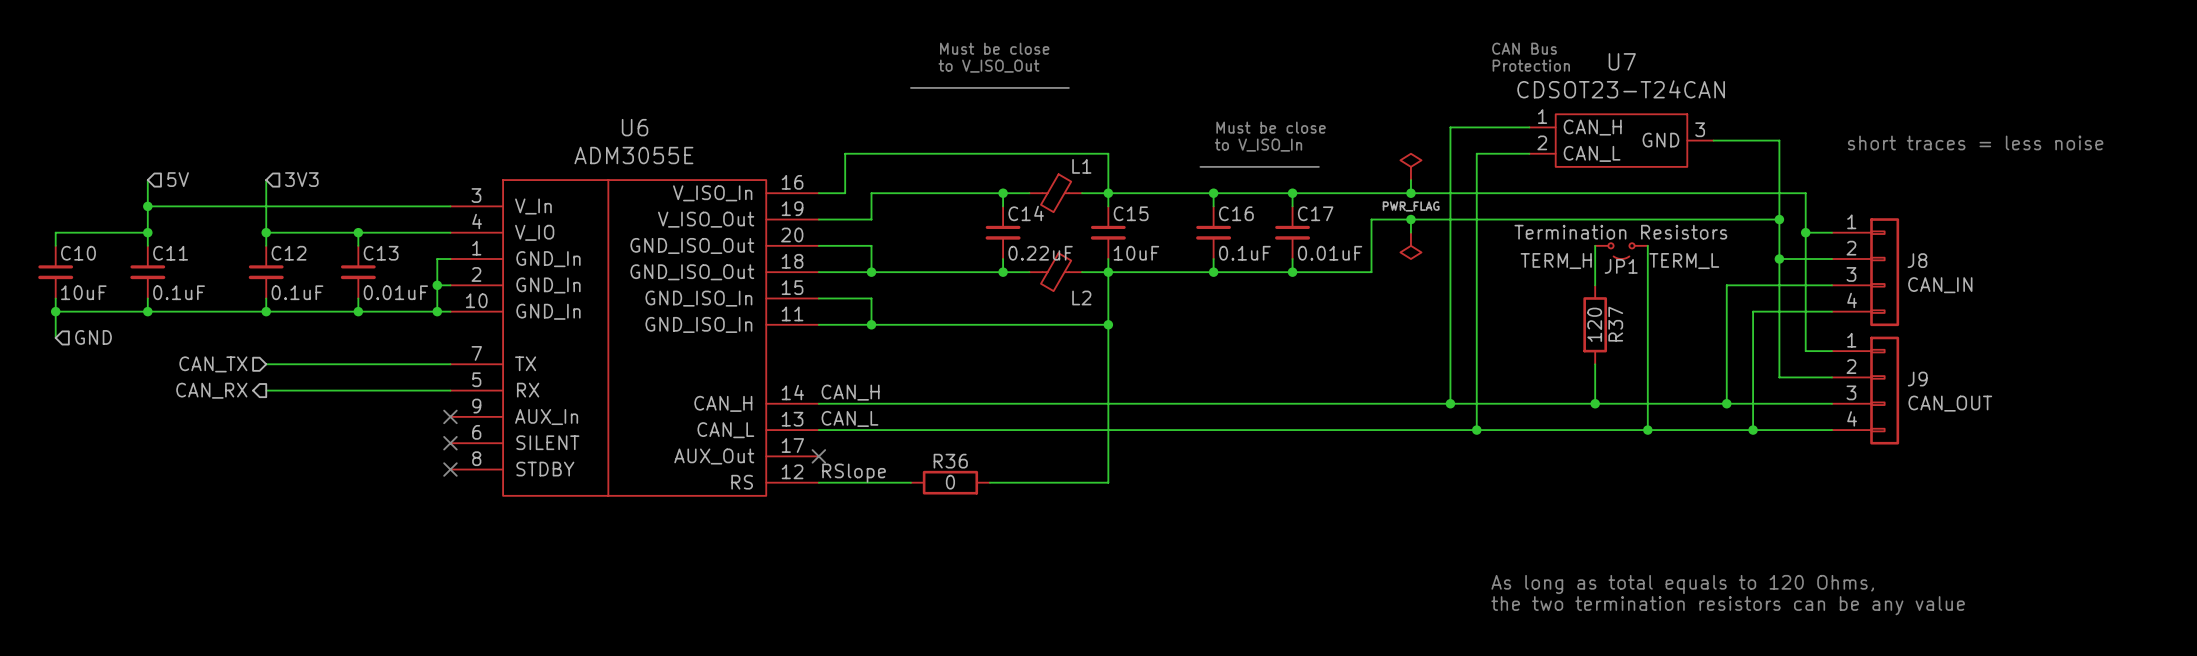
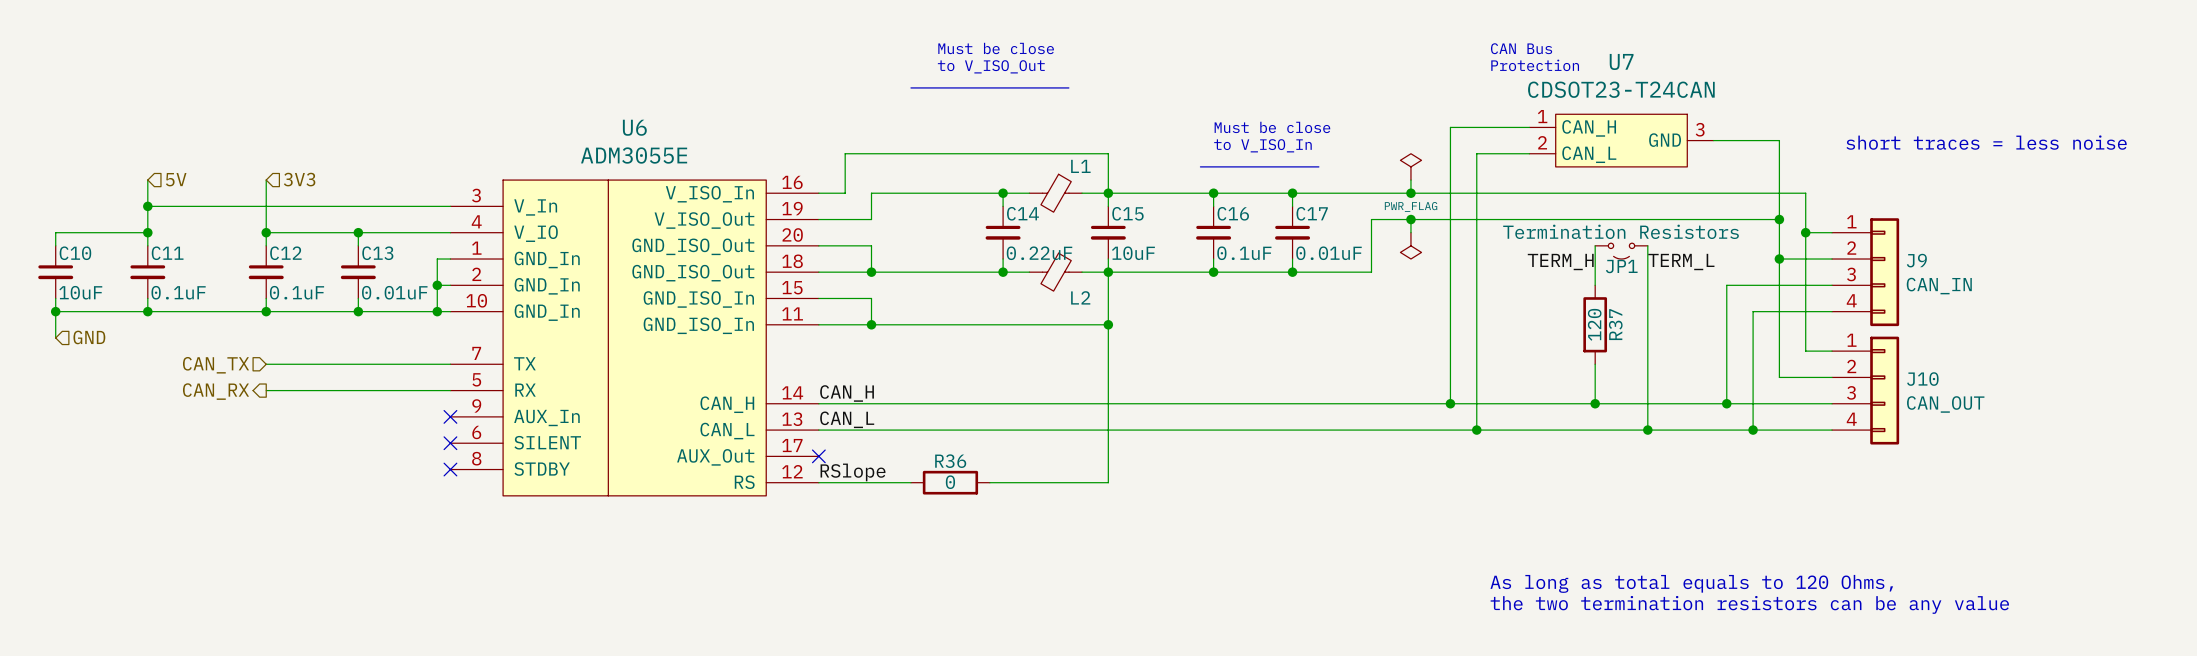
J8 name: J8 (1917, 260) -> J9 (1916, 260)
J9 name: J9 (1917, 379) -> J10 (1922, 379)

